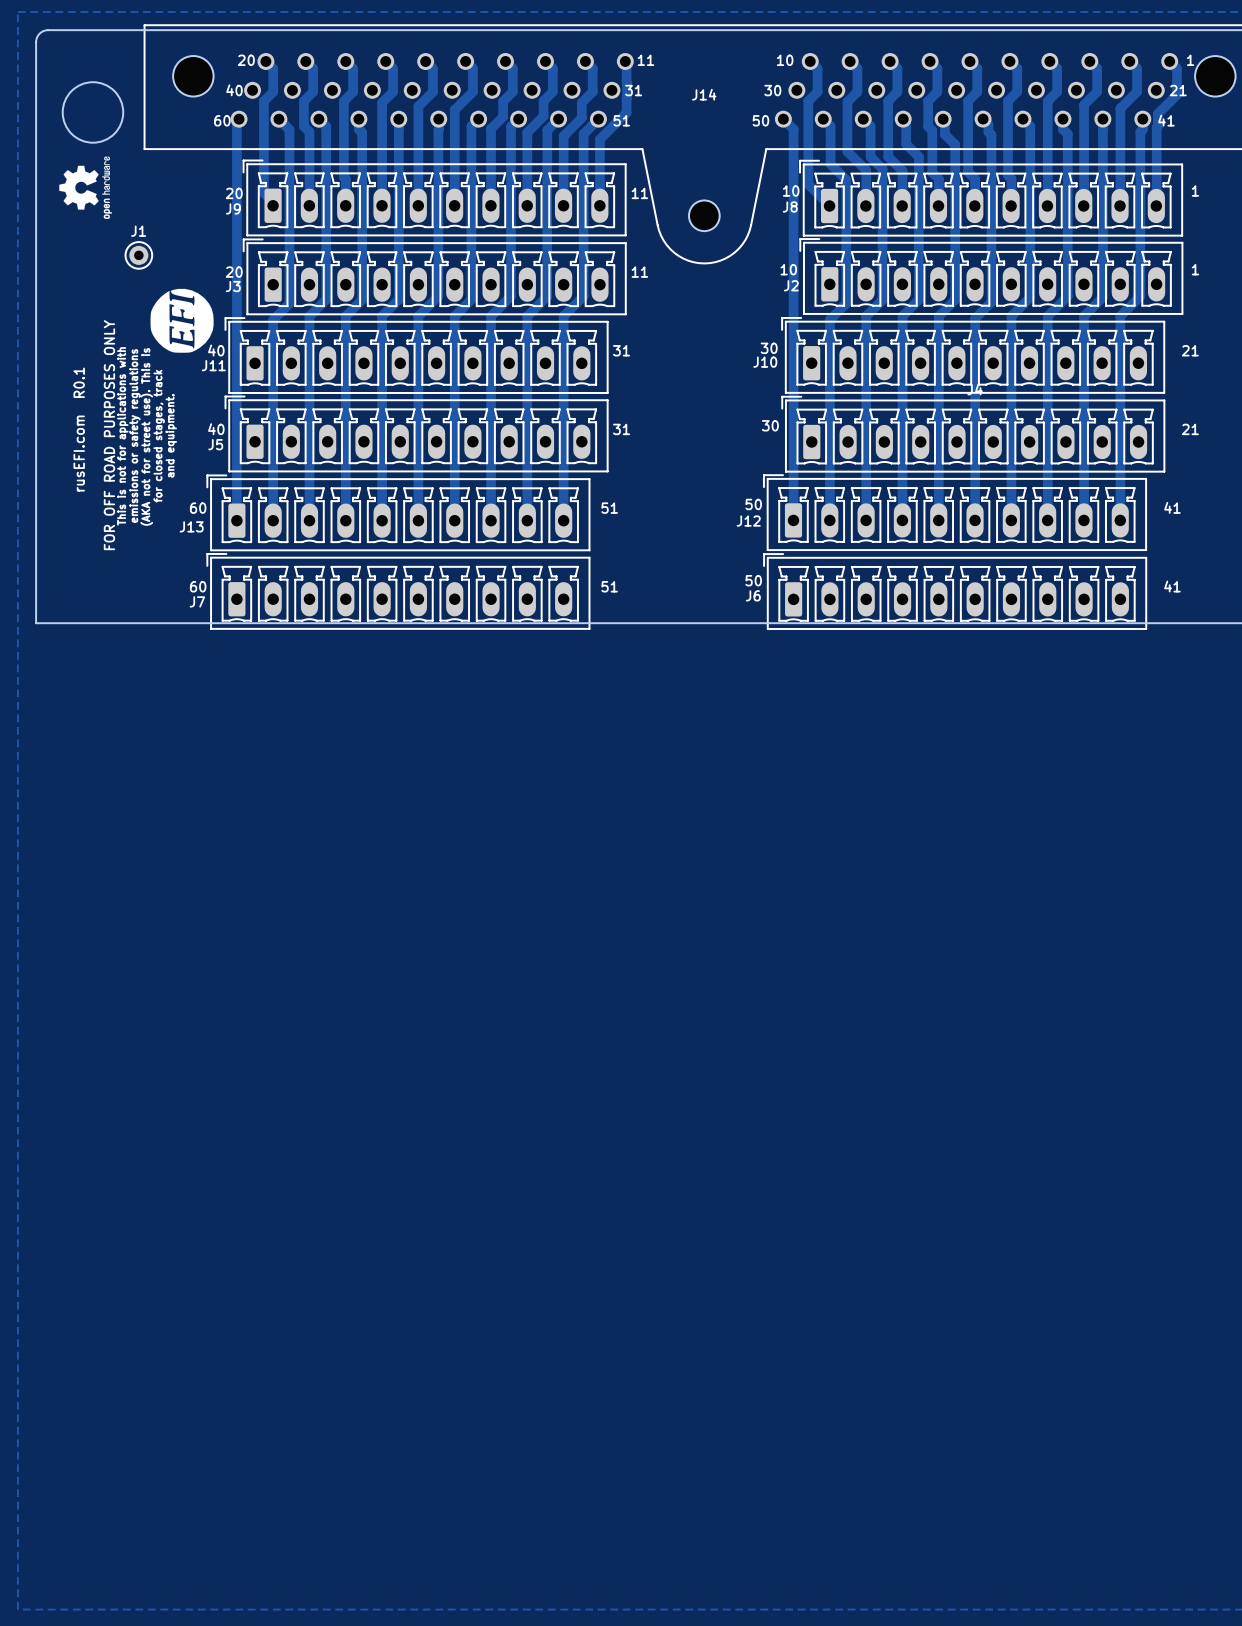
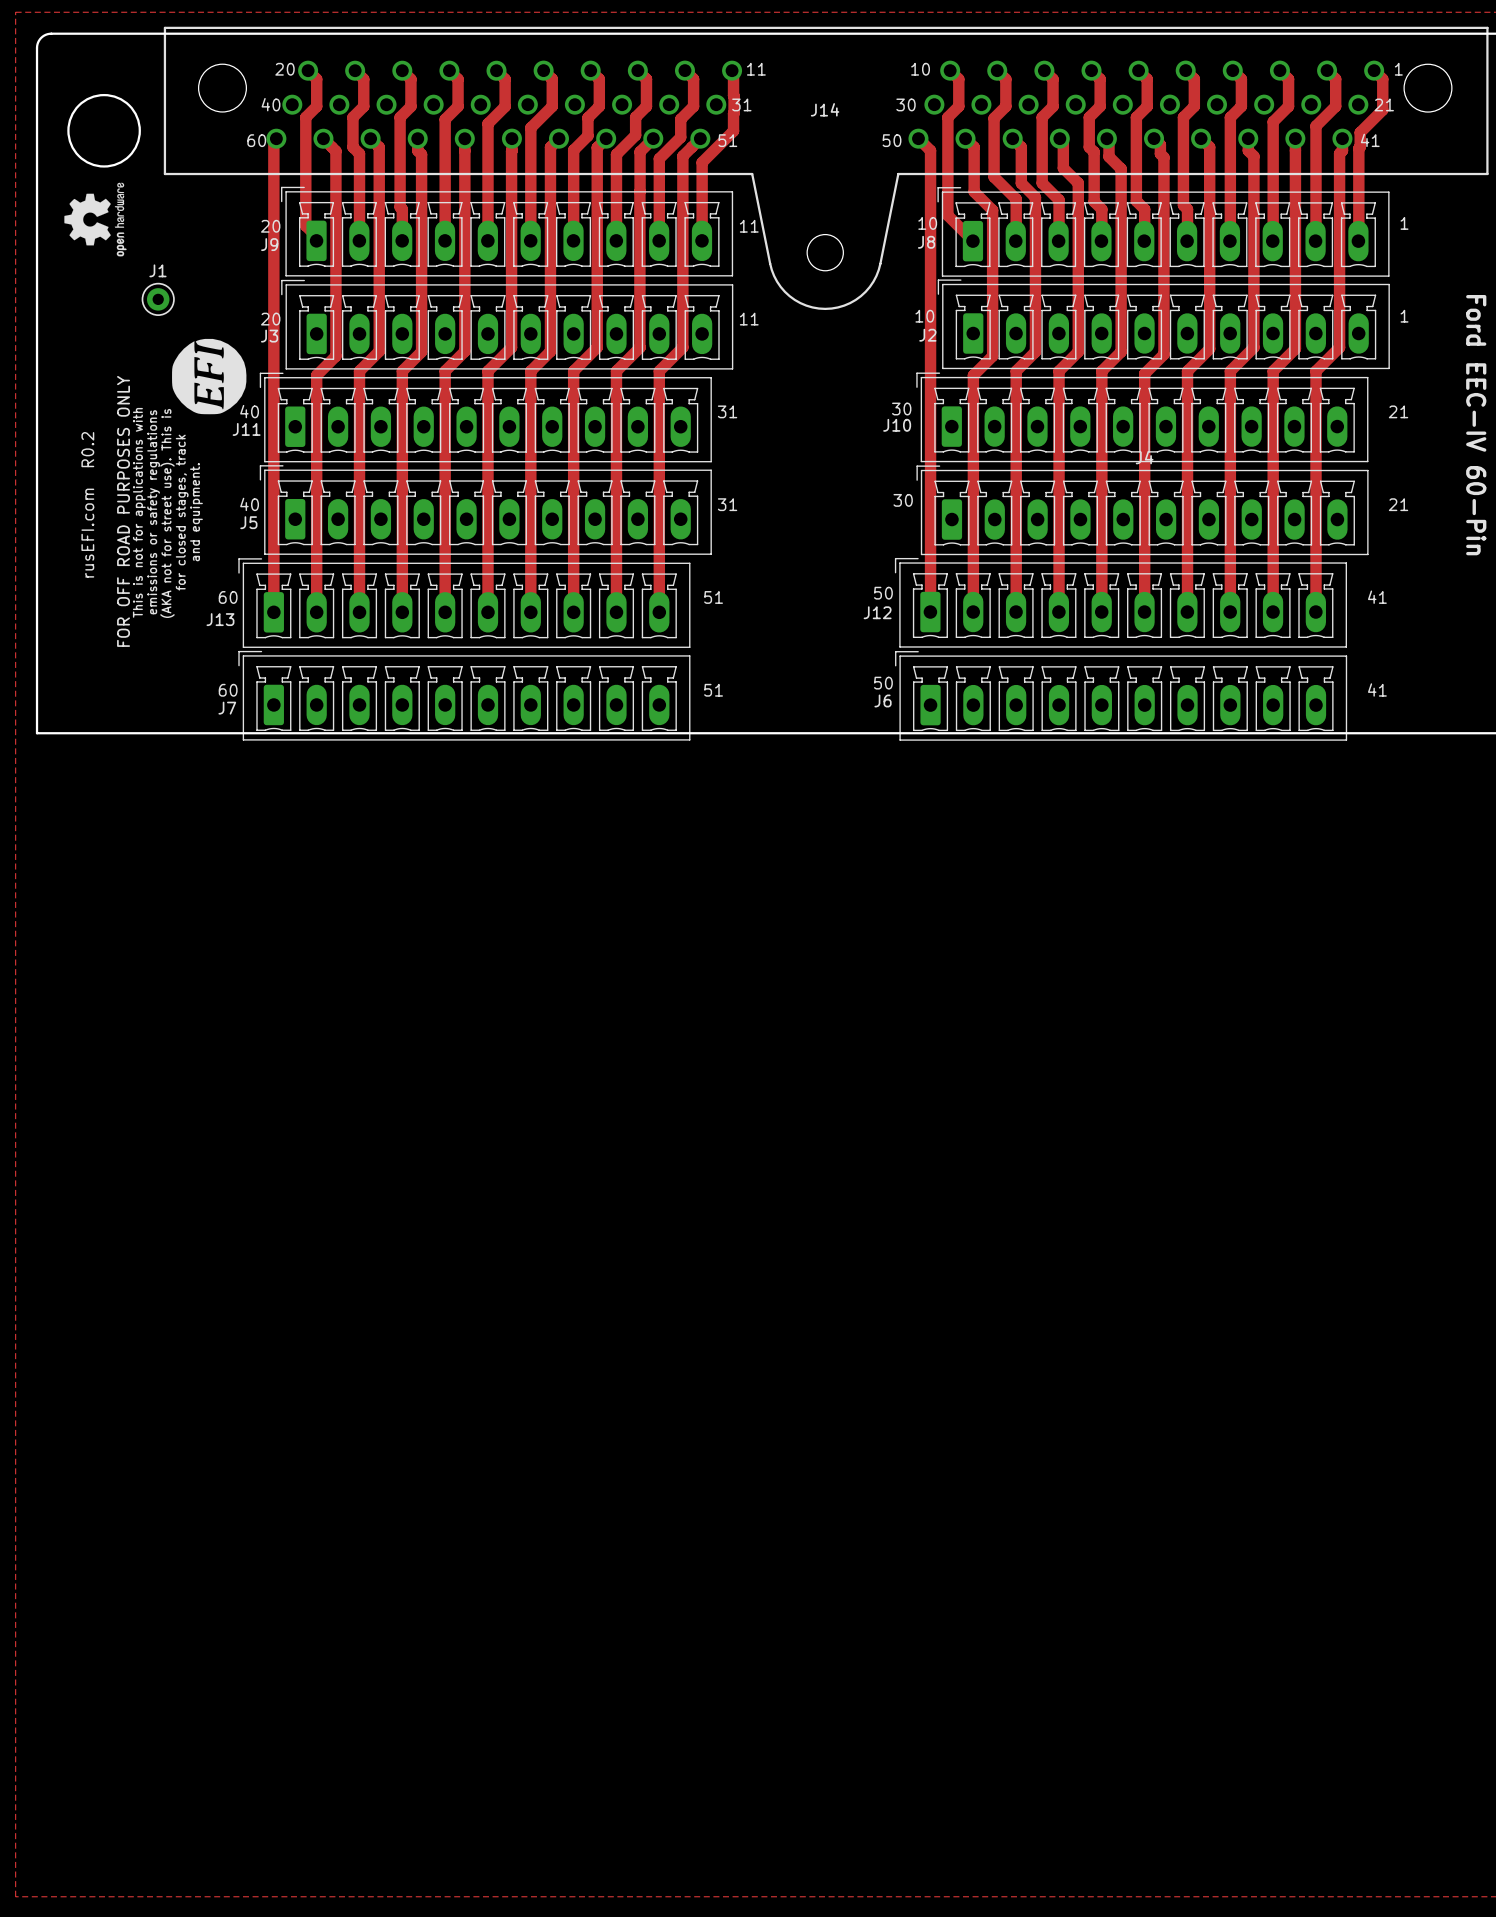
text: rusEFI.com R0.1 (79, 429) -> rusEFI.com R0.2 (87, 504)

